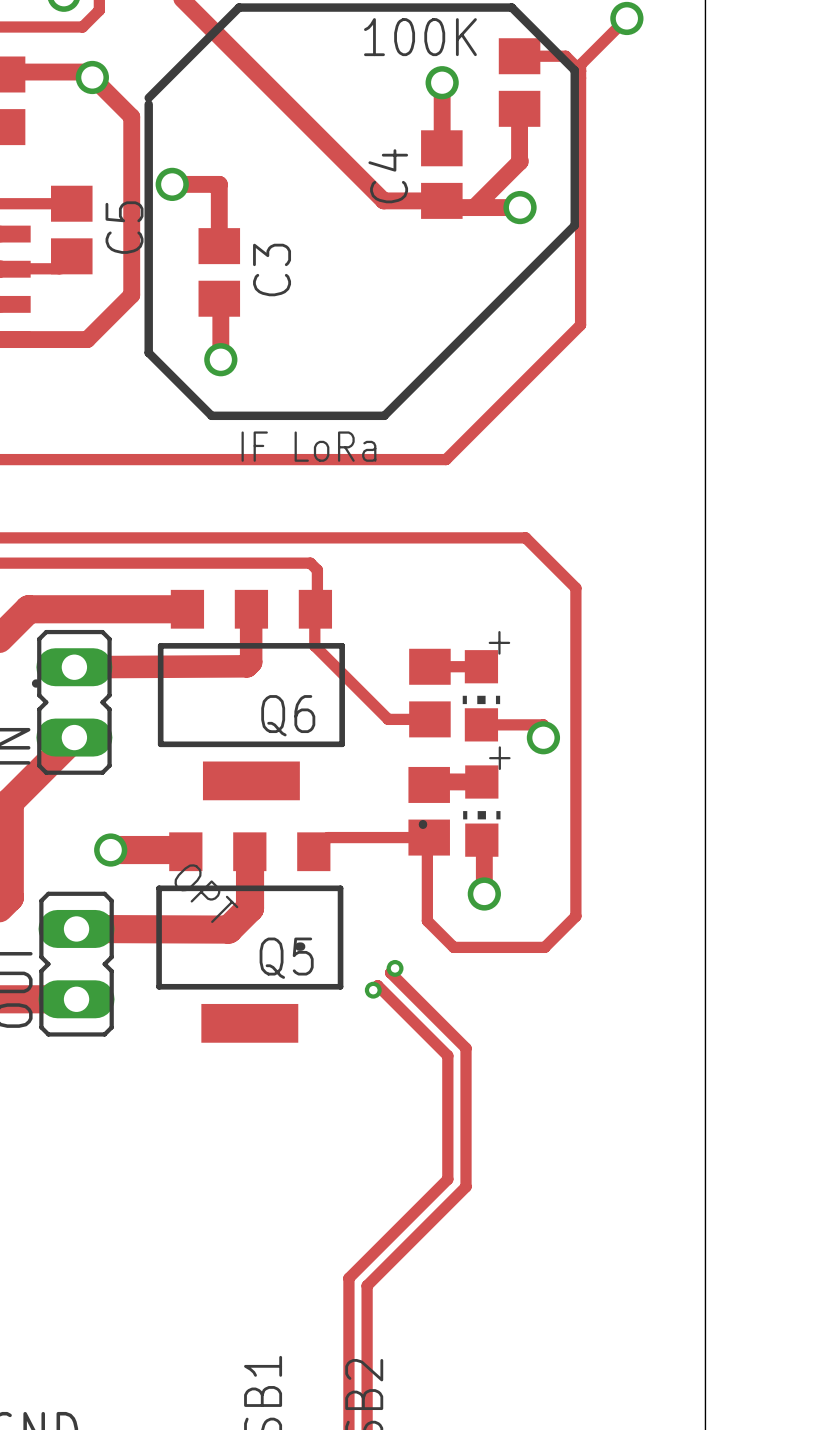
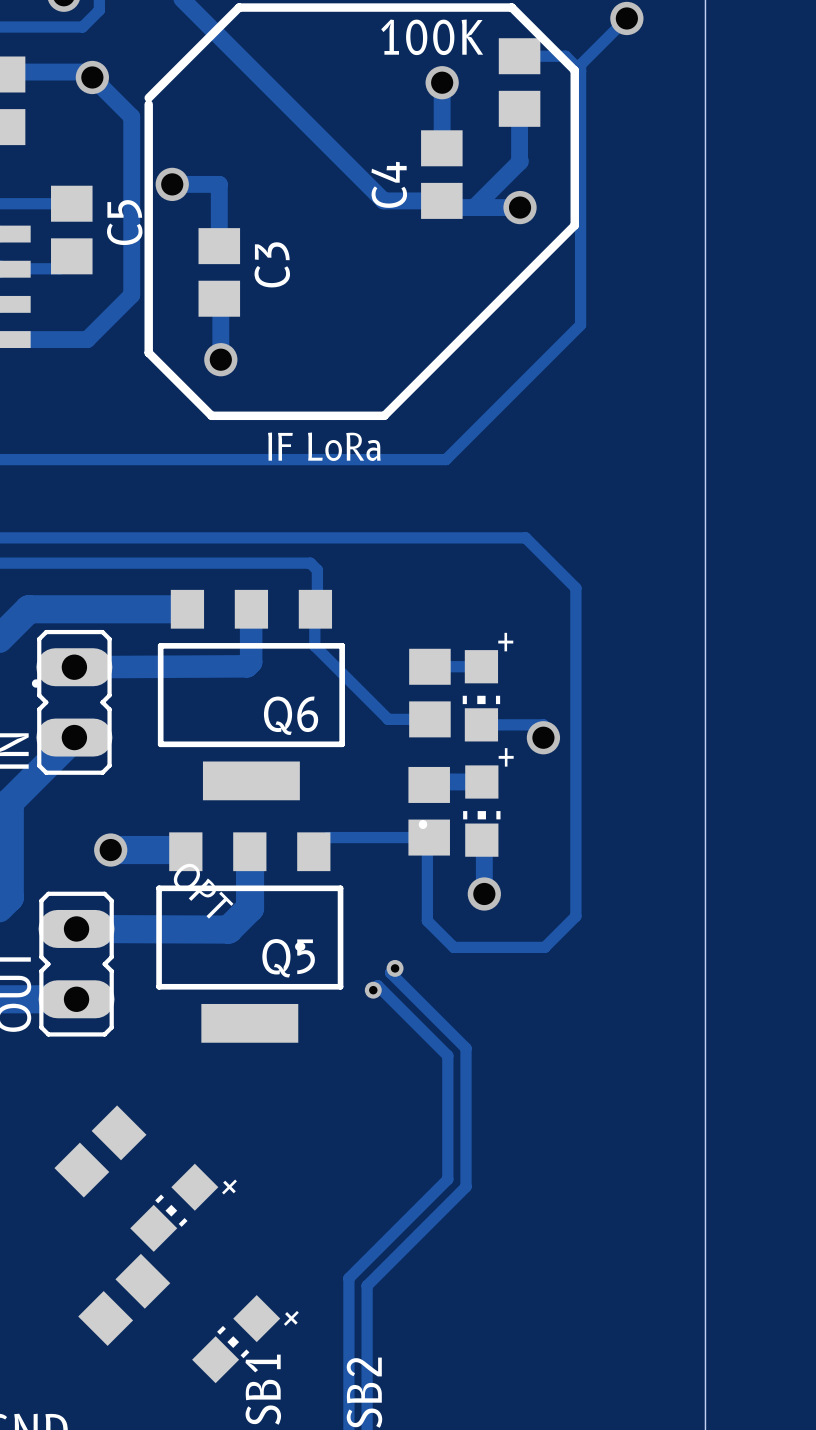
part: none -> (100, 1151)
part: none -> (174, 1207)
part: none -> (124, 1299)
part: none -> (236, 1339)

